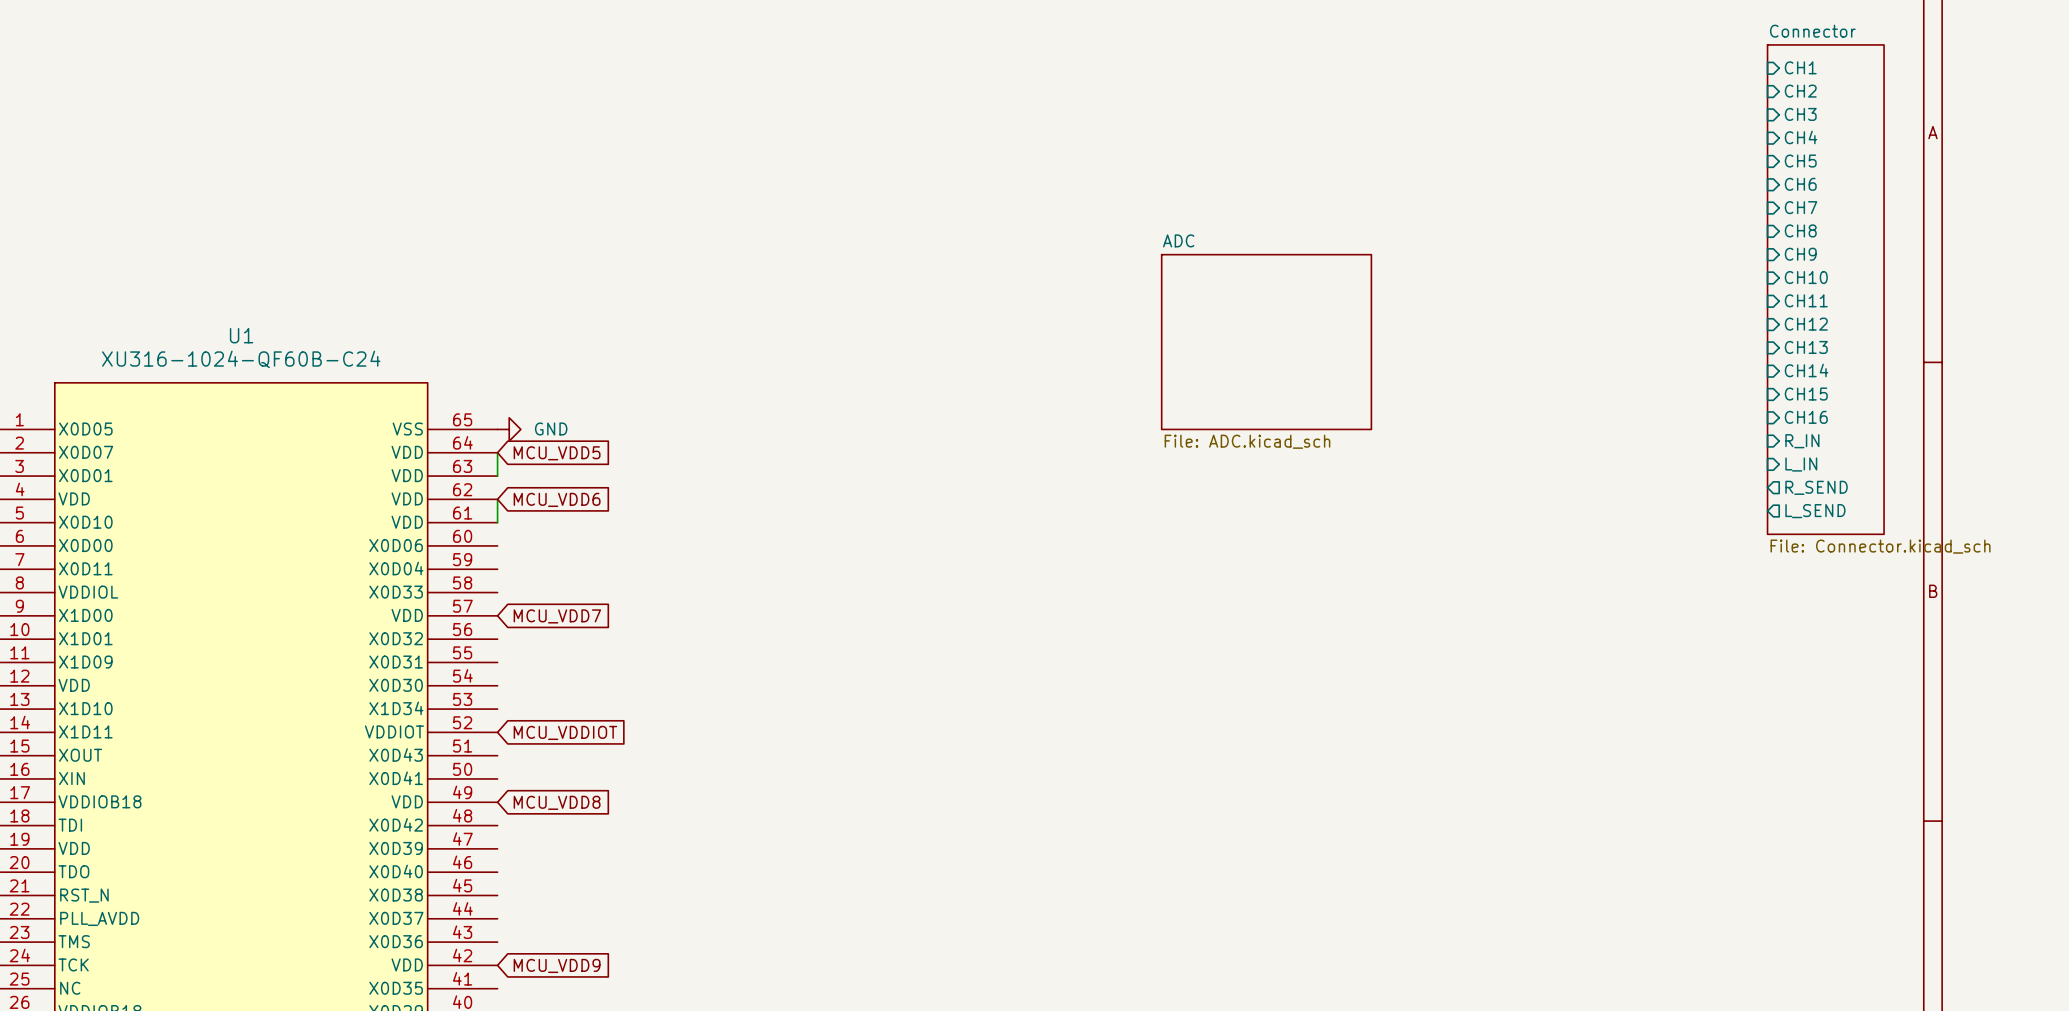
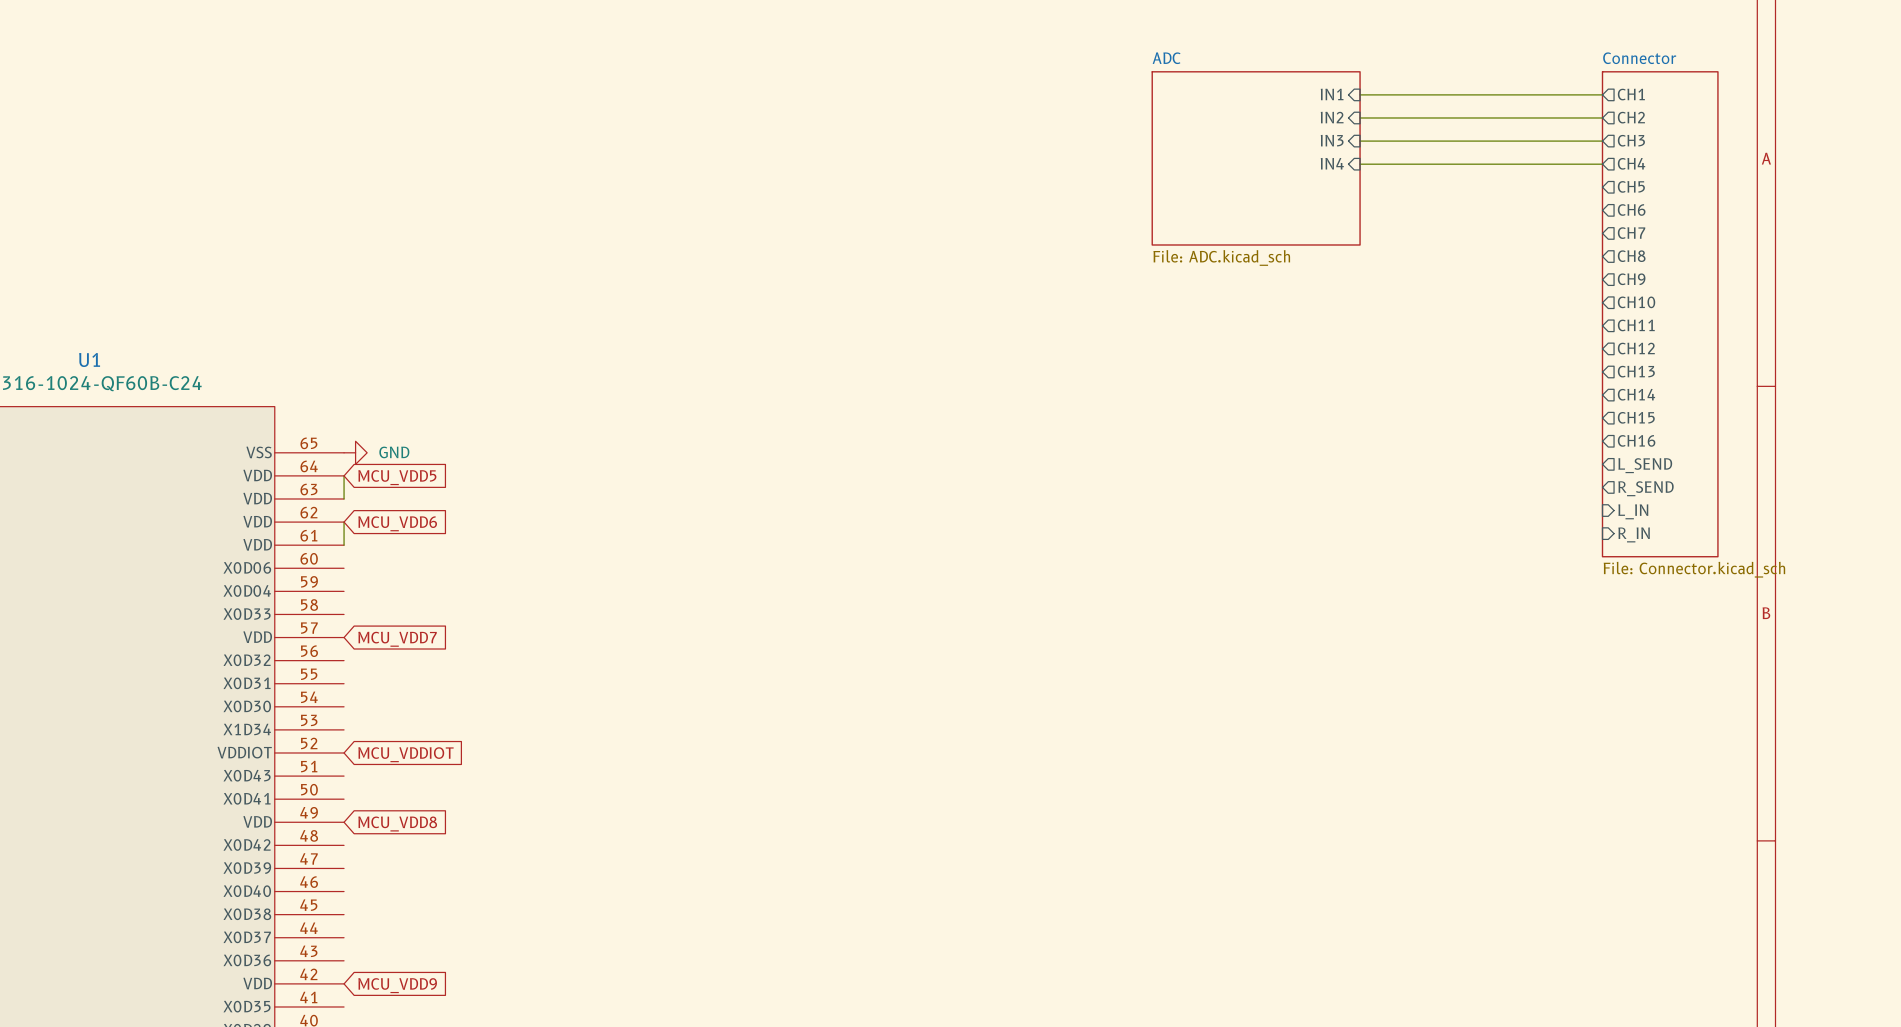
sheet pin: none -> IN1 (1332, 94)
sheet pin shape: input (1800, 67) -> output (1631, 94)
wire: none -> (1360, 94) (1602, 94)
sheet pin: none -> IN2 (1332, 117)
wire: none -> (1360, 117) (1602, 117)
sheet pin shape: input (1800, 91) -> output (1631, 117)
sheet pin: none -> IN3 (1332, 140)
wire: none -> (1360, 141) (1602, 141)
sheet pin shape: input (1800, 114) -> output (1631, 140)
sheet ADC: none -> File: ADC.kicad_sch (1256, 158)
sheet pin: none -> IN4 (1332, 163)
sheet pin shape: input (1801, 137) -> output (1631, 163)
wire: none -> (1360, 164) (1602, 164)
sheet pin shape: input (1800, 161) -> output (1631, 186)
sheet pin shape: input (1800, 184) -> output (1631, 209)
sheet pin shape: input (1801, 207) -> output (1631, 233)
sheet pin shape: input (1800, 230) -> output (1631, 256)
sheet pin shape: input (1800, 254) -> output (1631, 279)
sheet pin shape: input (1806, 277) -> output (1636, 302)
sheet pin shape: input (1806, 300) -> output (1636, 325)
sheet pin shape: input (1806, 324) -> output (1636, 348)
sheet ADC: File: ADC.kicad_sch (1266, 342) -> none
sheet pin shape: input (1806, 347) -> output (1636, 371)
sheet pin shape: input (1806, 370) -> output (1636, 394)
sheet pin shape: input (1806, 394) -> output (1636, 417)
sheet pin shape: input (1806, 417) -> output (1636, 440)
sheet pin shape: input (1802, 441) -> output (1645, 465)
sheet pin: R_IN (1802, 441) -> L_SEND (1645, 465)
sheet pin shape: input (1801, 464) -> output (1646, 488)
sheet pin: L_IN (1801, 464) -> R_SEND (1646, 488)
sheet pin shape: output (1816, 487) -> input (1633, 511)
sheet pin: R_SEND (1816, 487) -> L_IN (1633, 511)
sheet pin shape: output (1815, 511) -> input (1634, 534)
sheet pin: L_SEND (1815, 511) -> R_IN (1634, 534)

